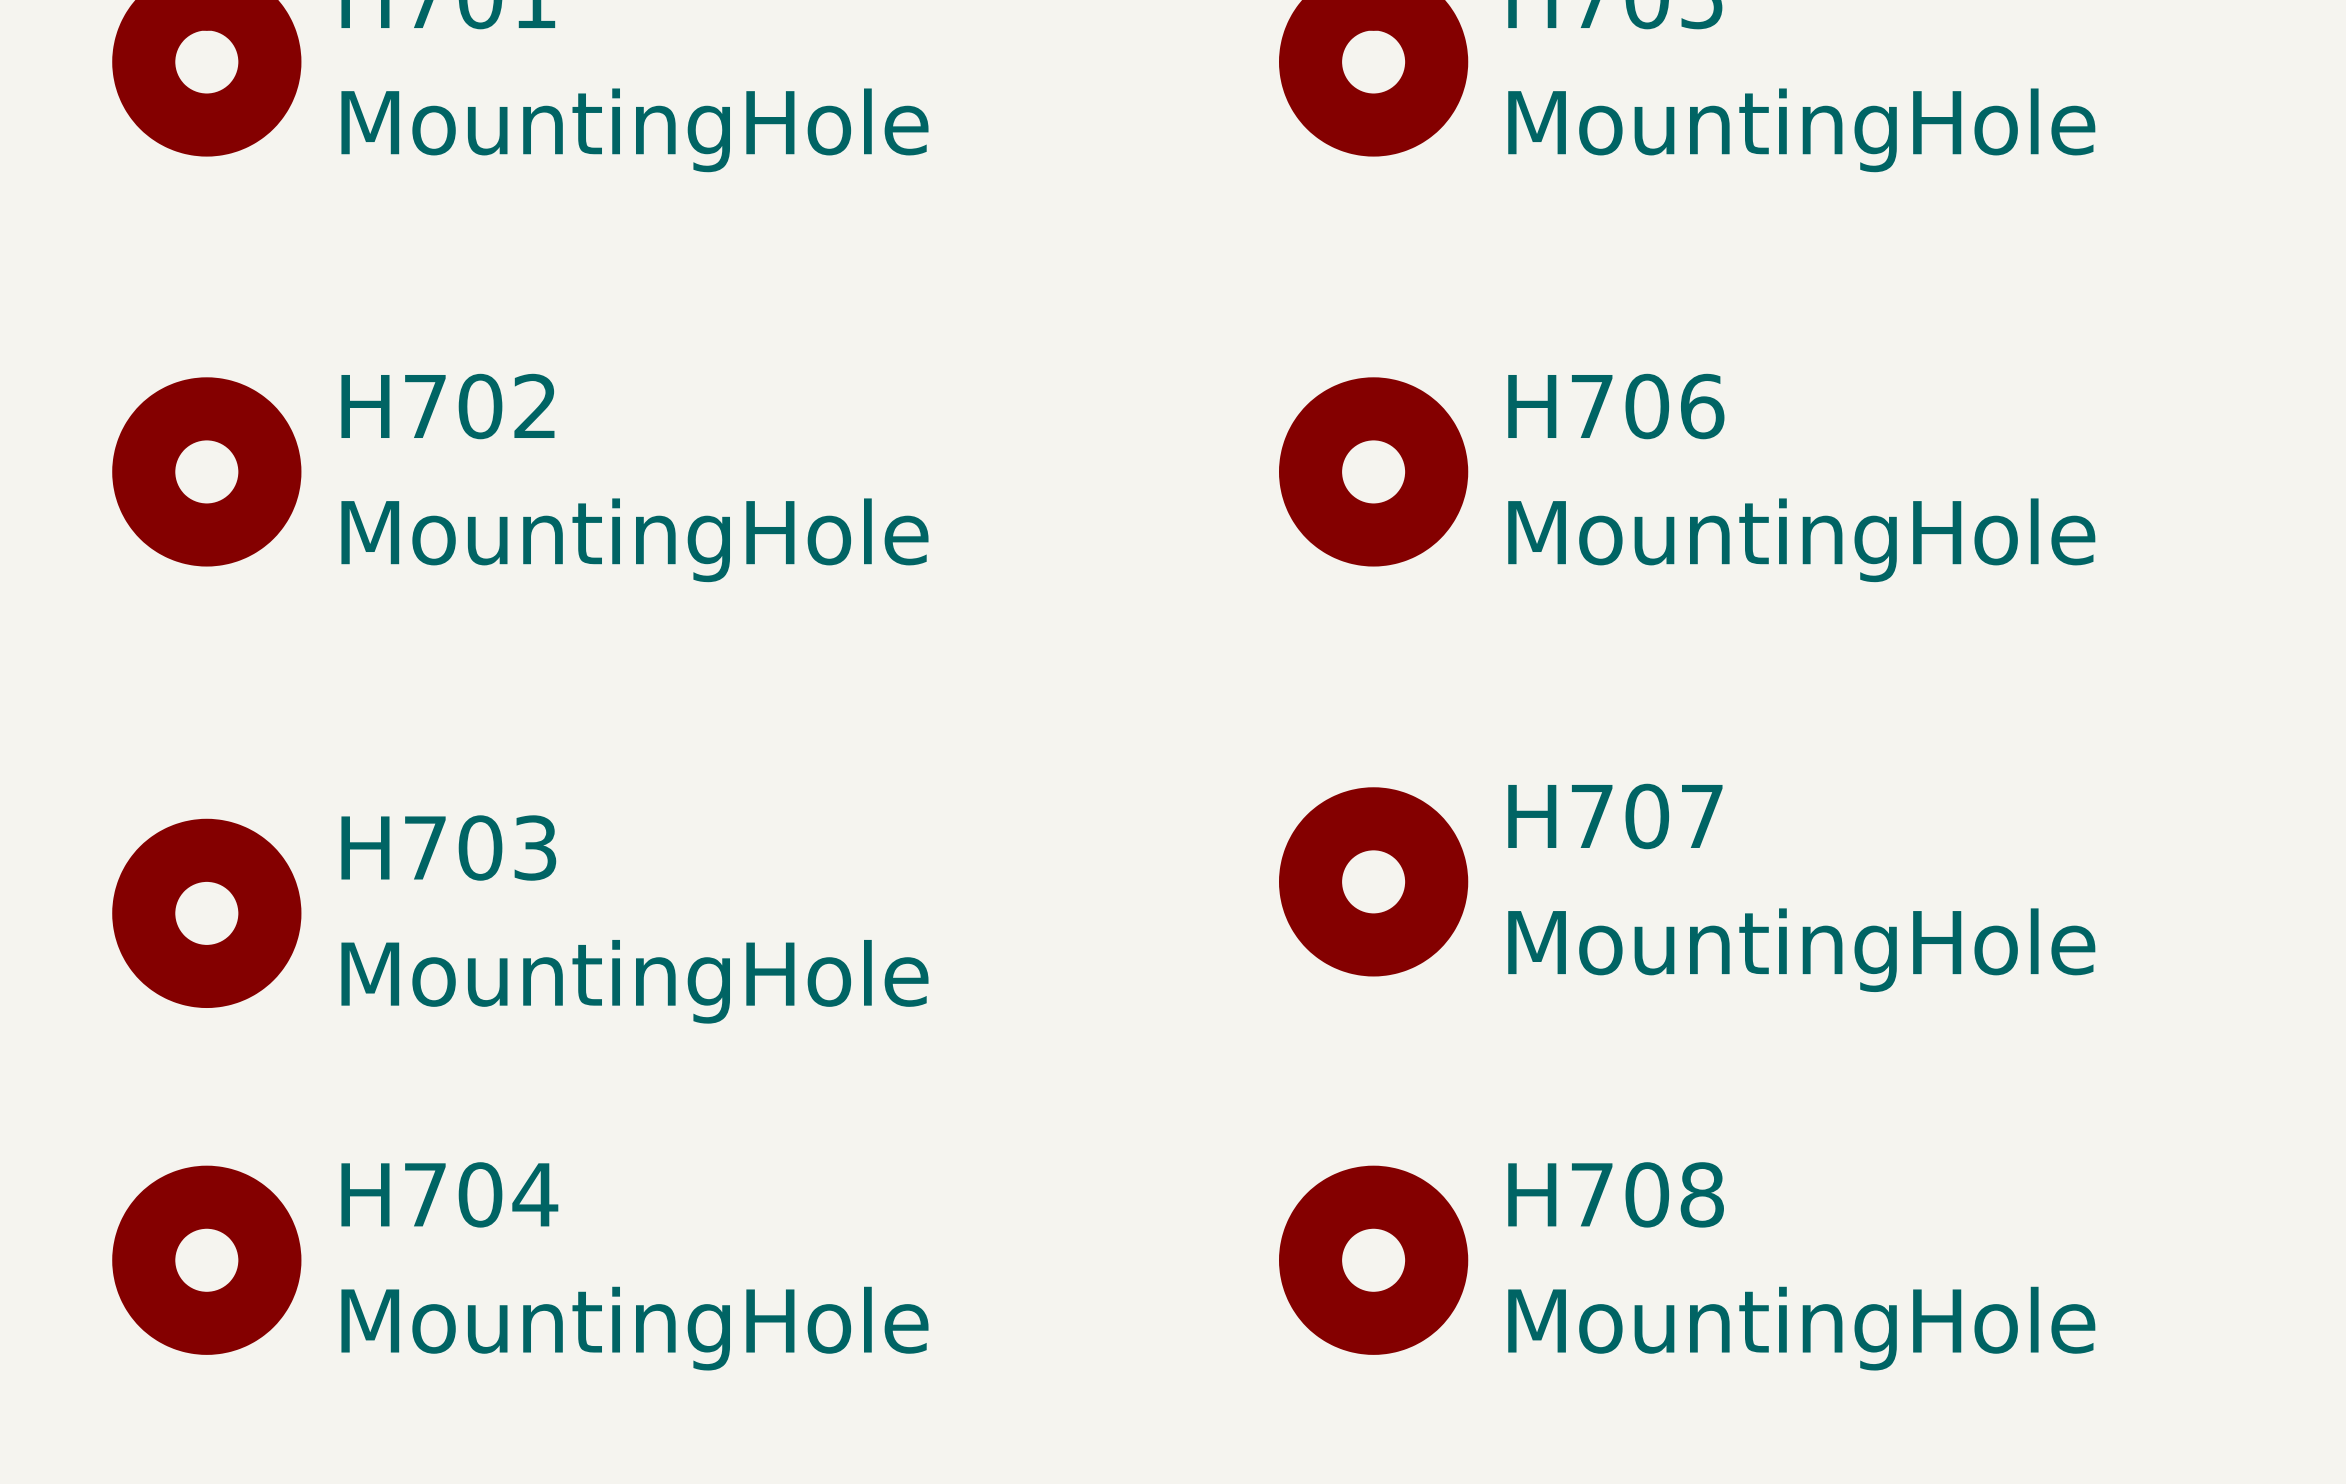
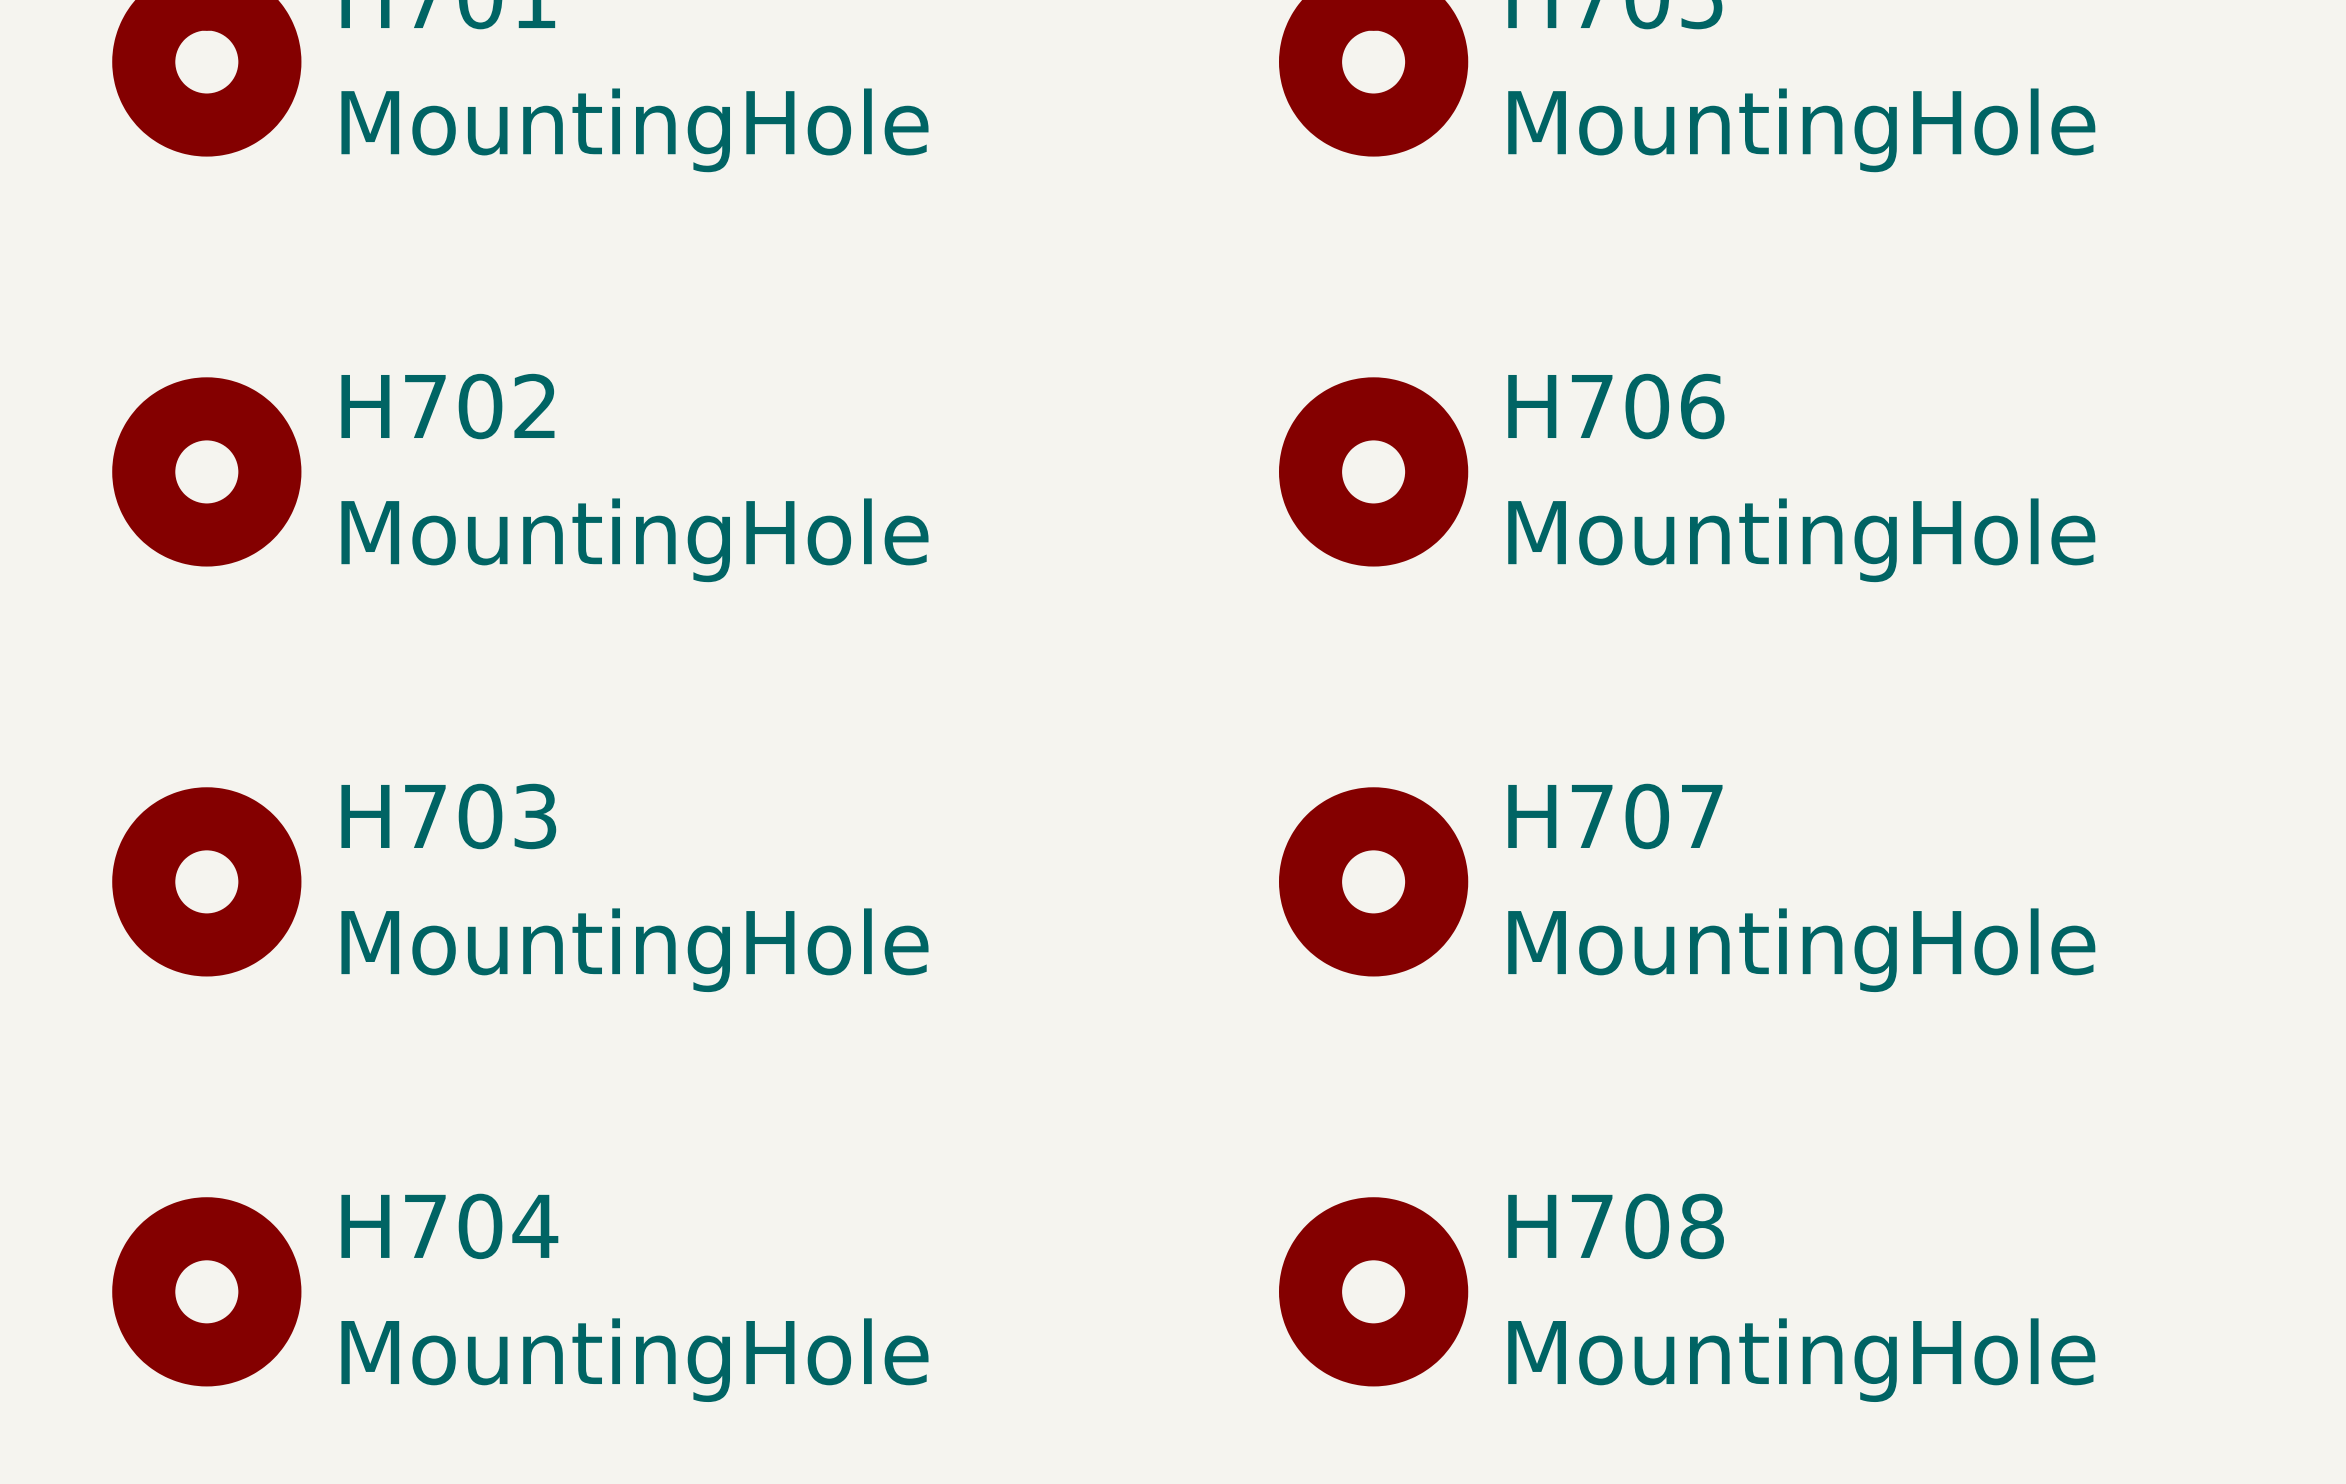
H703 position: (206, 913) -> (206, 881)
H704 position: (206, 1260) -> (206, 1291)
H708 position: (1373, 1260) -> (1373, 1291)

